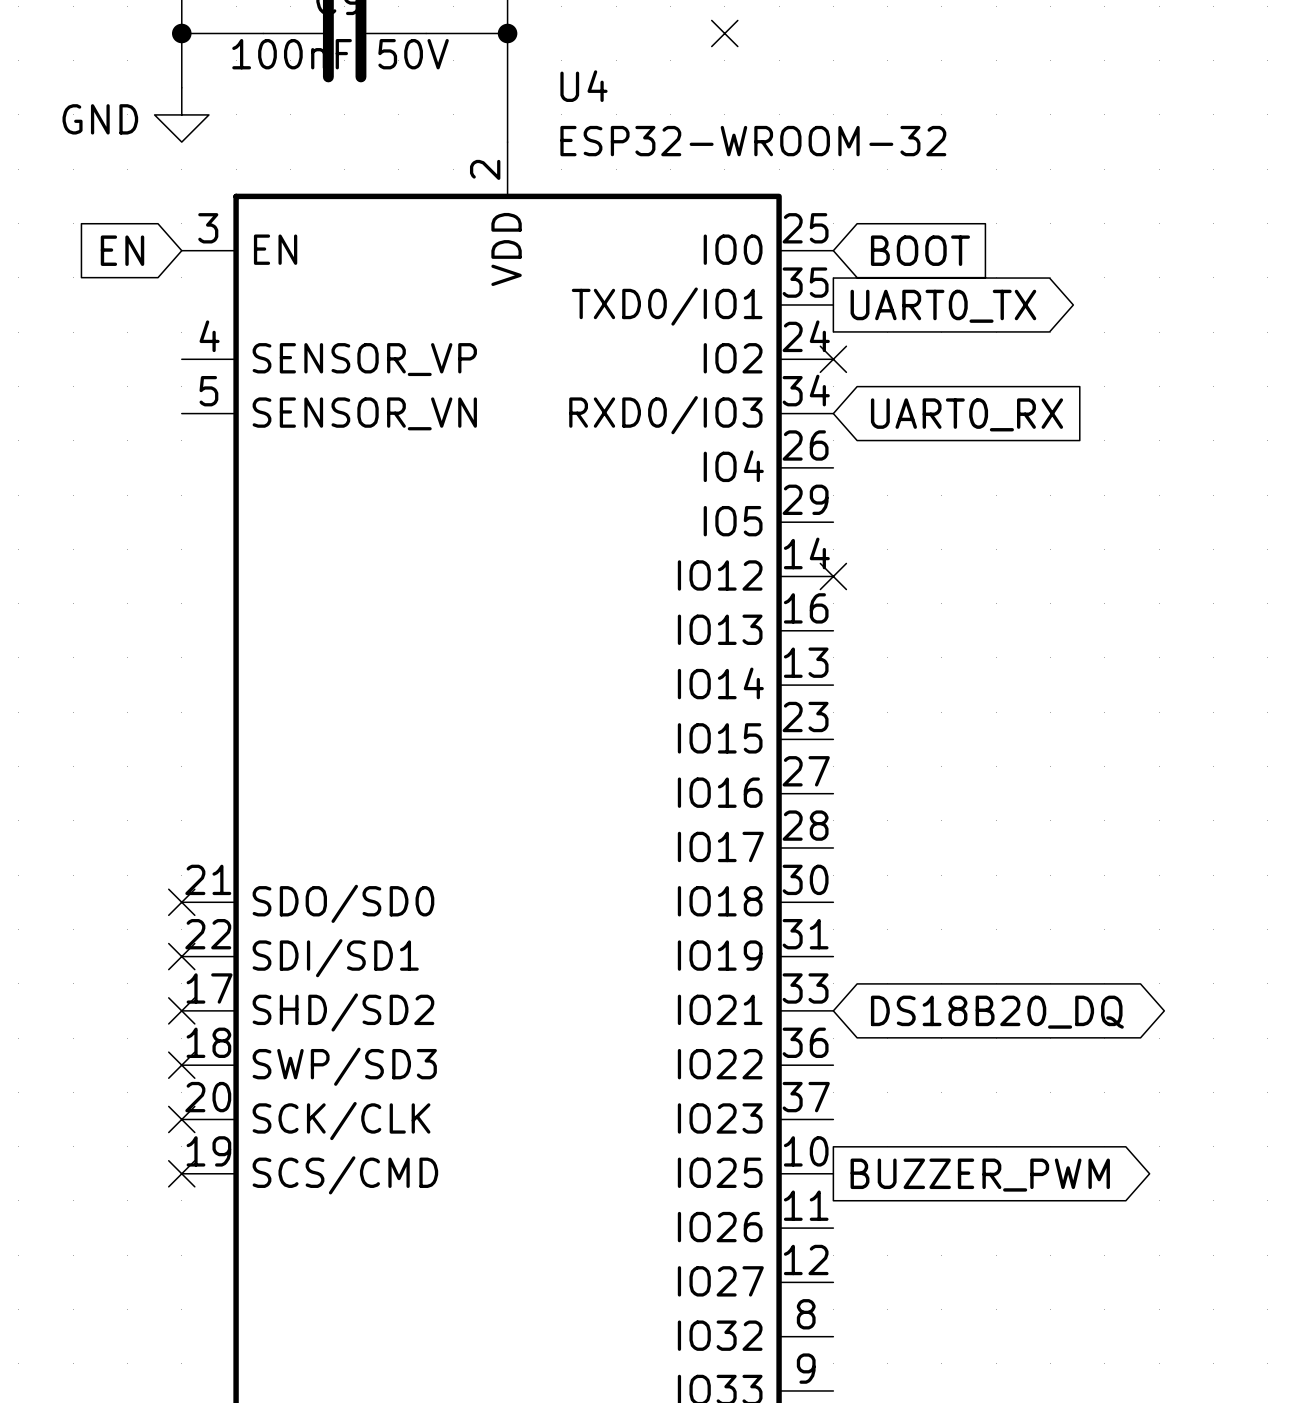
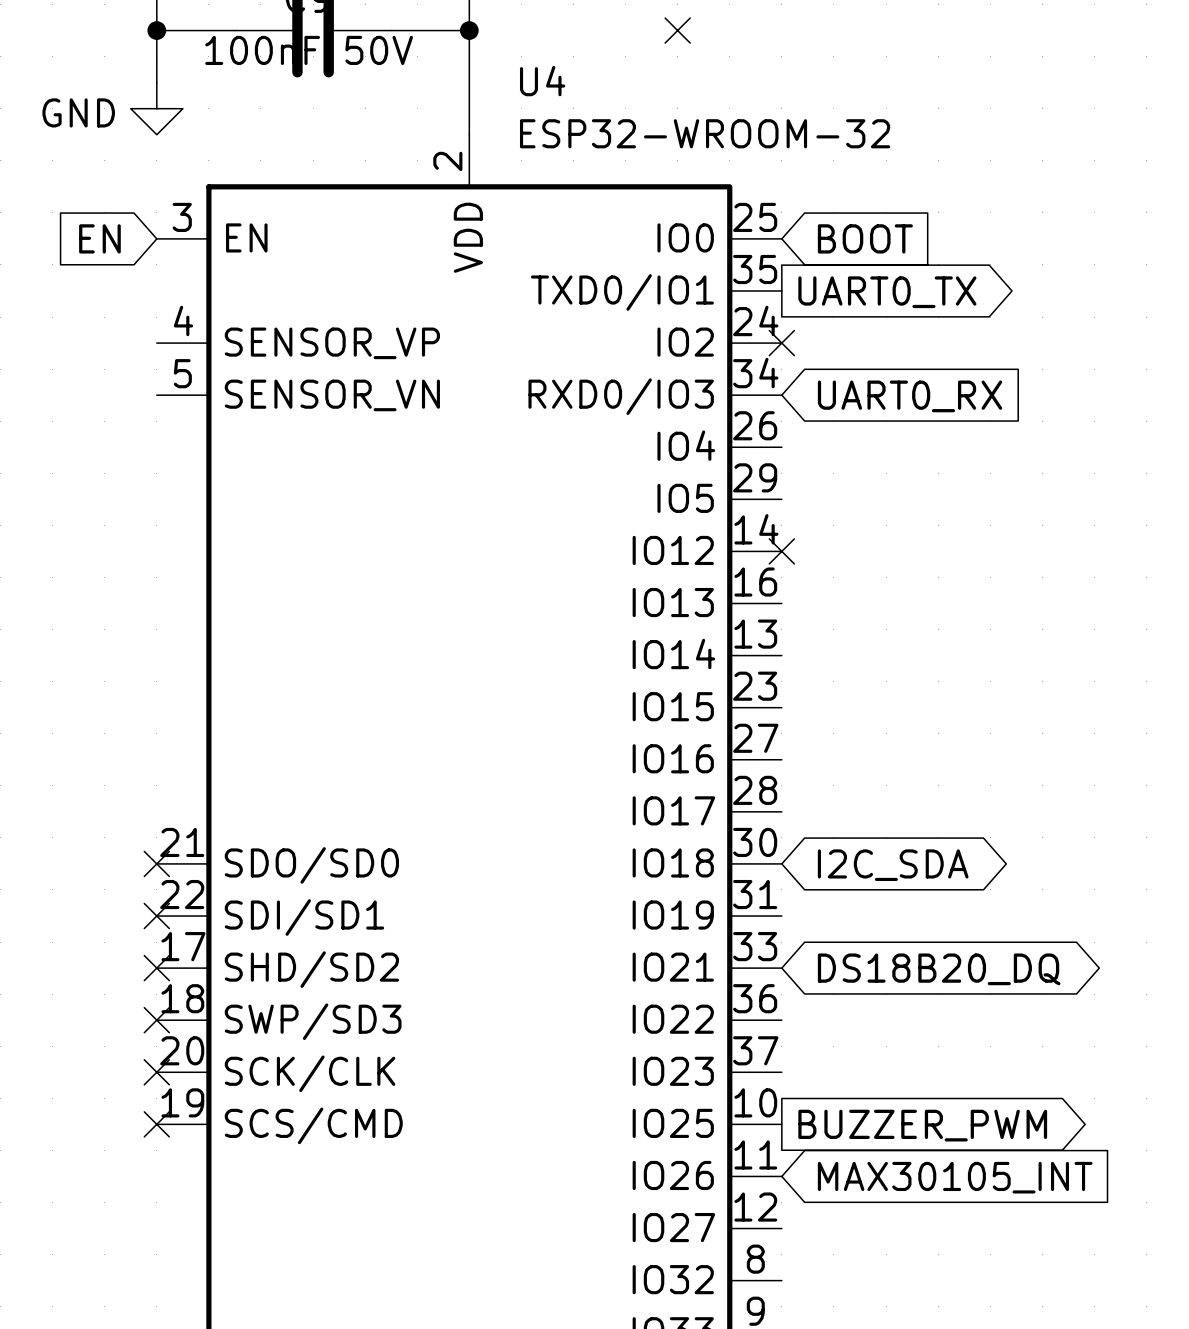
global label: none -> I2C_SDA (893, 865)
global label: none -> MAX30105_INT (955, 1177)

